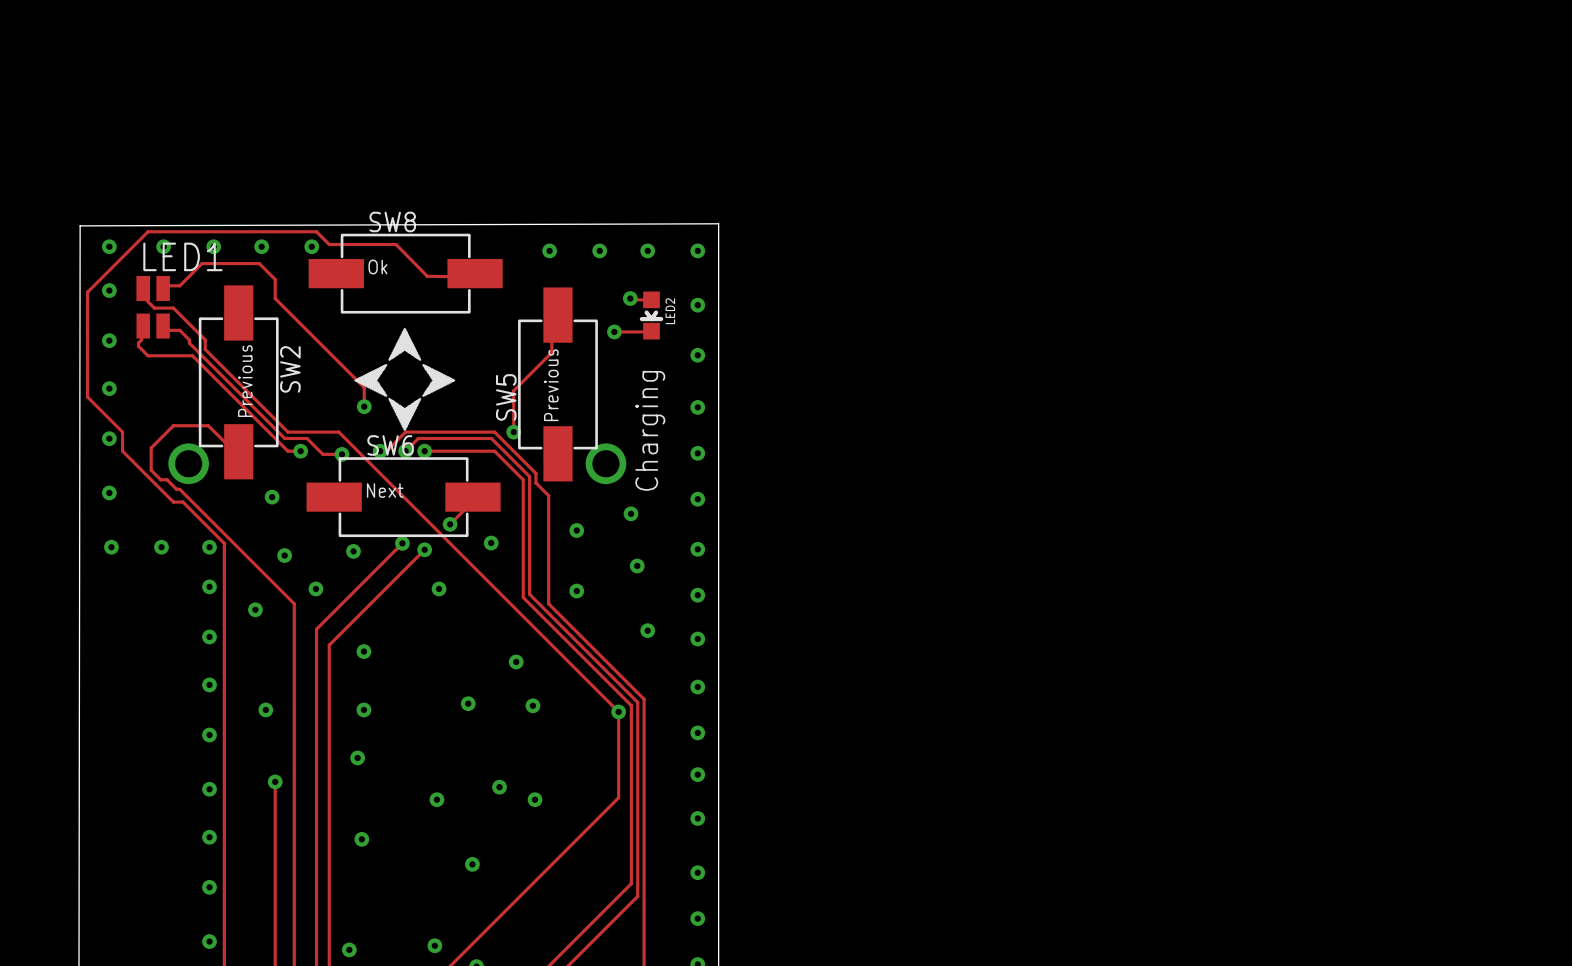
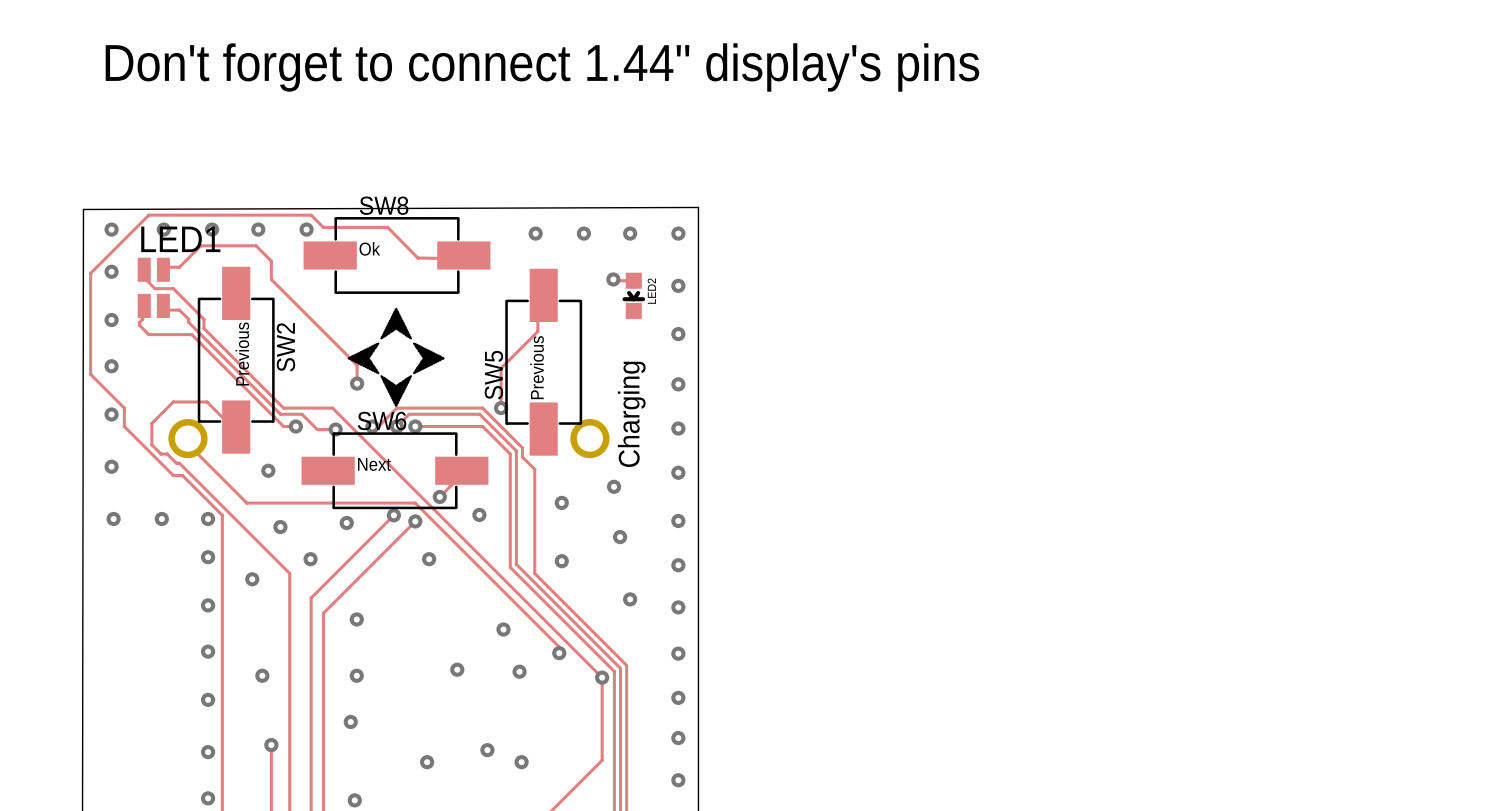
text: none -> Don't forget to connect 1.44" display's pins (542, 67)
via: (614, 331) -> none
track: (651, 331) (614, 331) -> none
track: none -> (187, 438) (188, 444) (246, 503) (415, 503) (559, 647) (559, 653)
via: none -> (559, 653)

